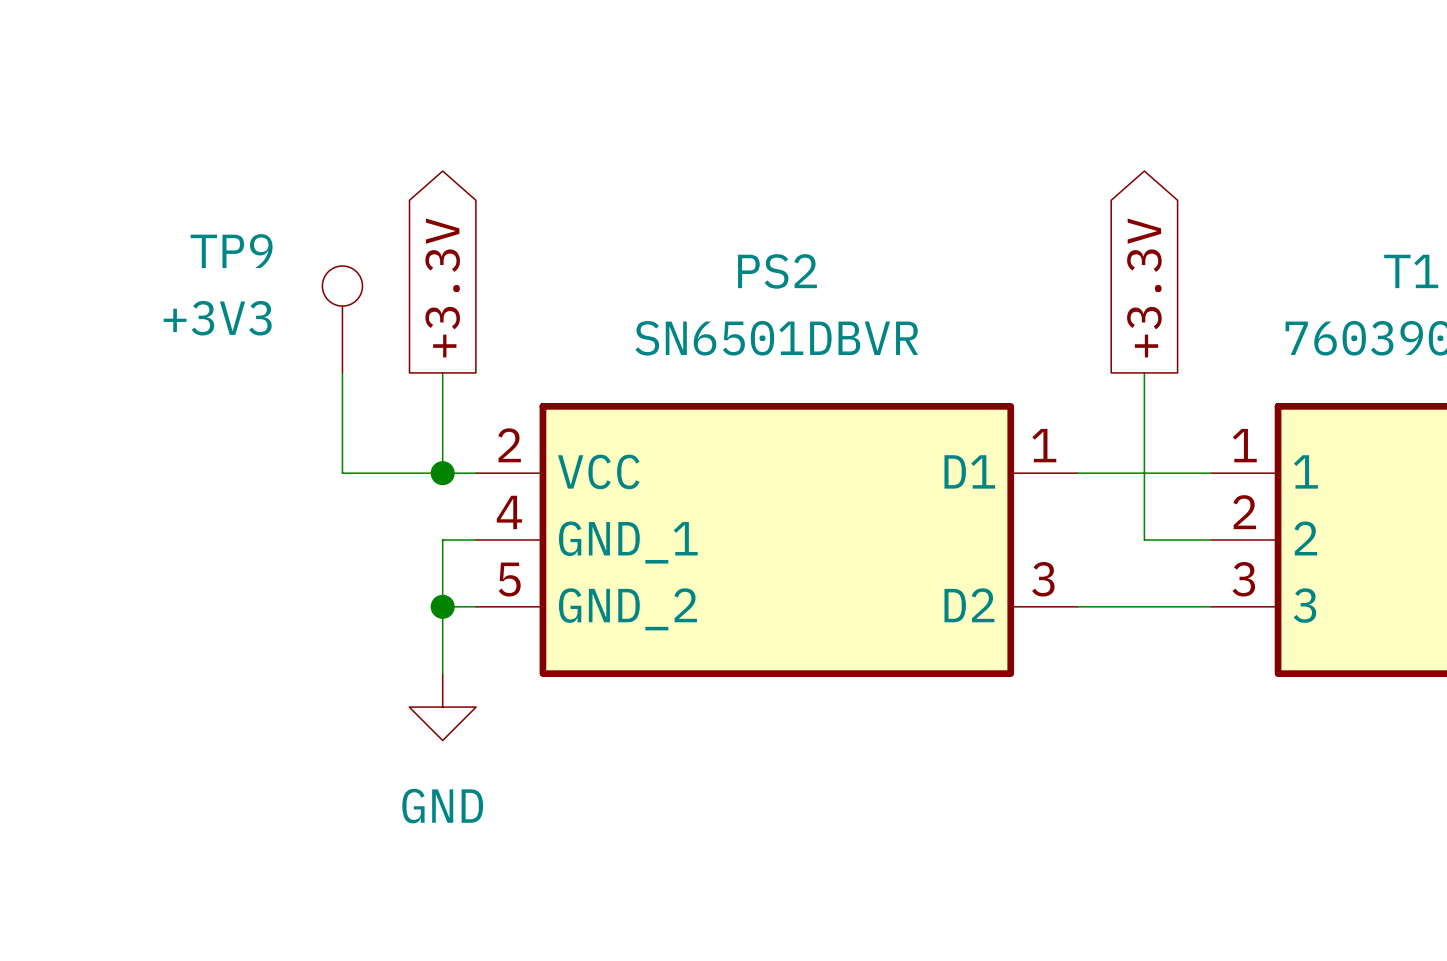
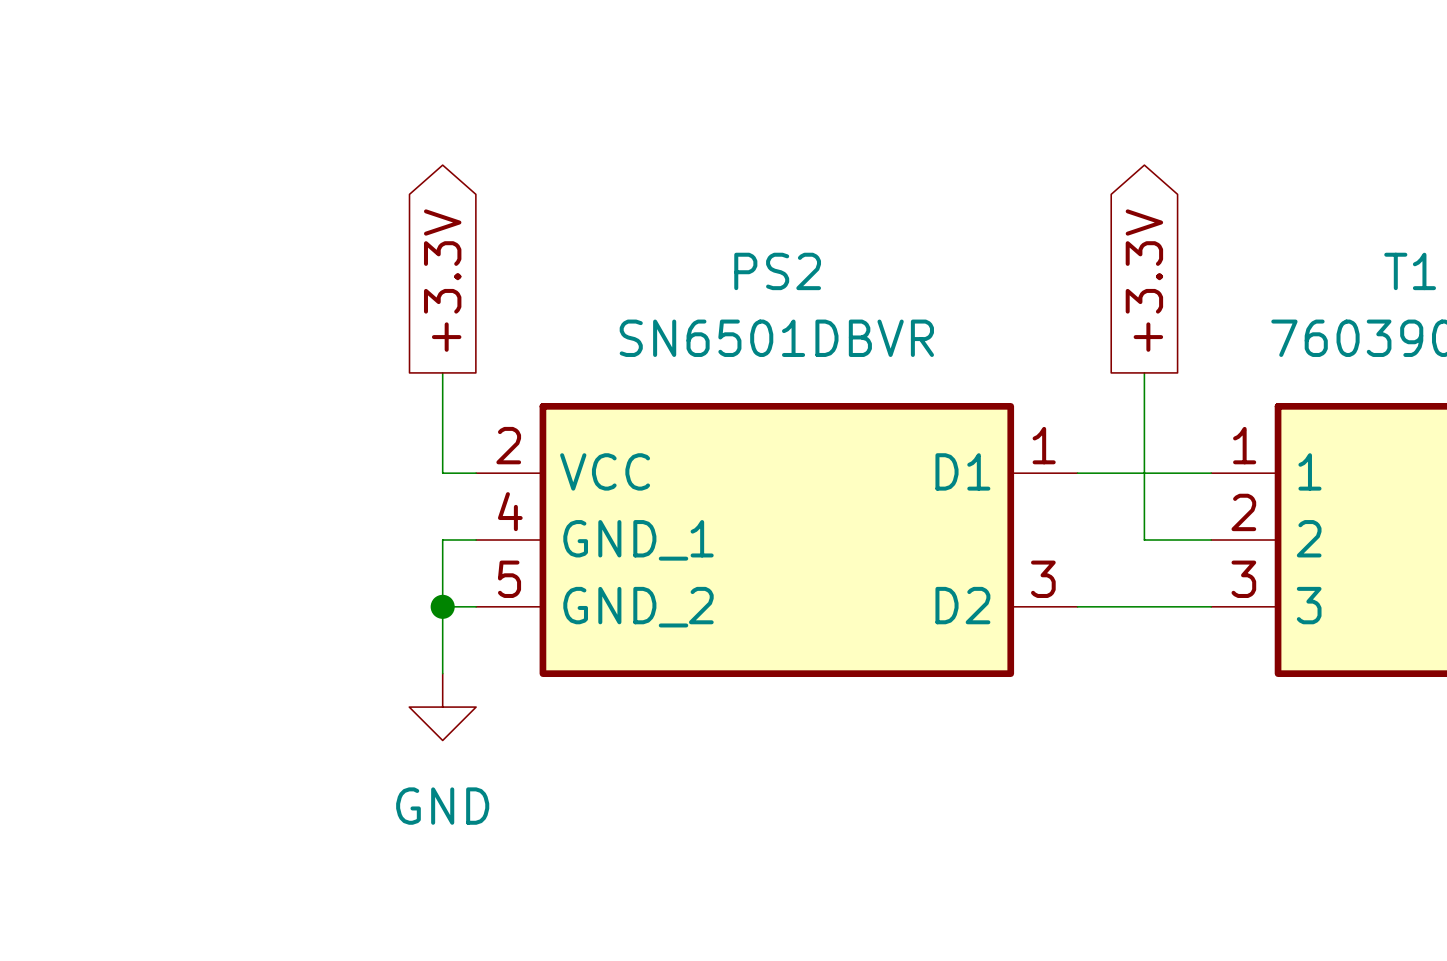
TP9: +3V3 (342, 319) -> none
wire: (342, 372) (342, 473) (442, 473) -> none
junction: (442, 473) -> none

